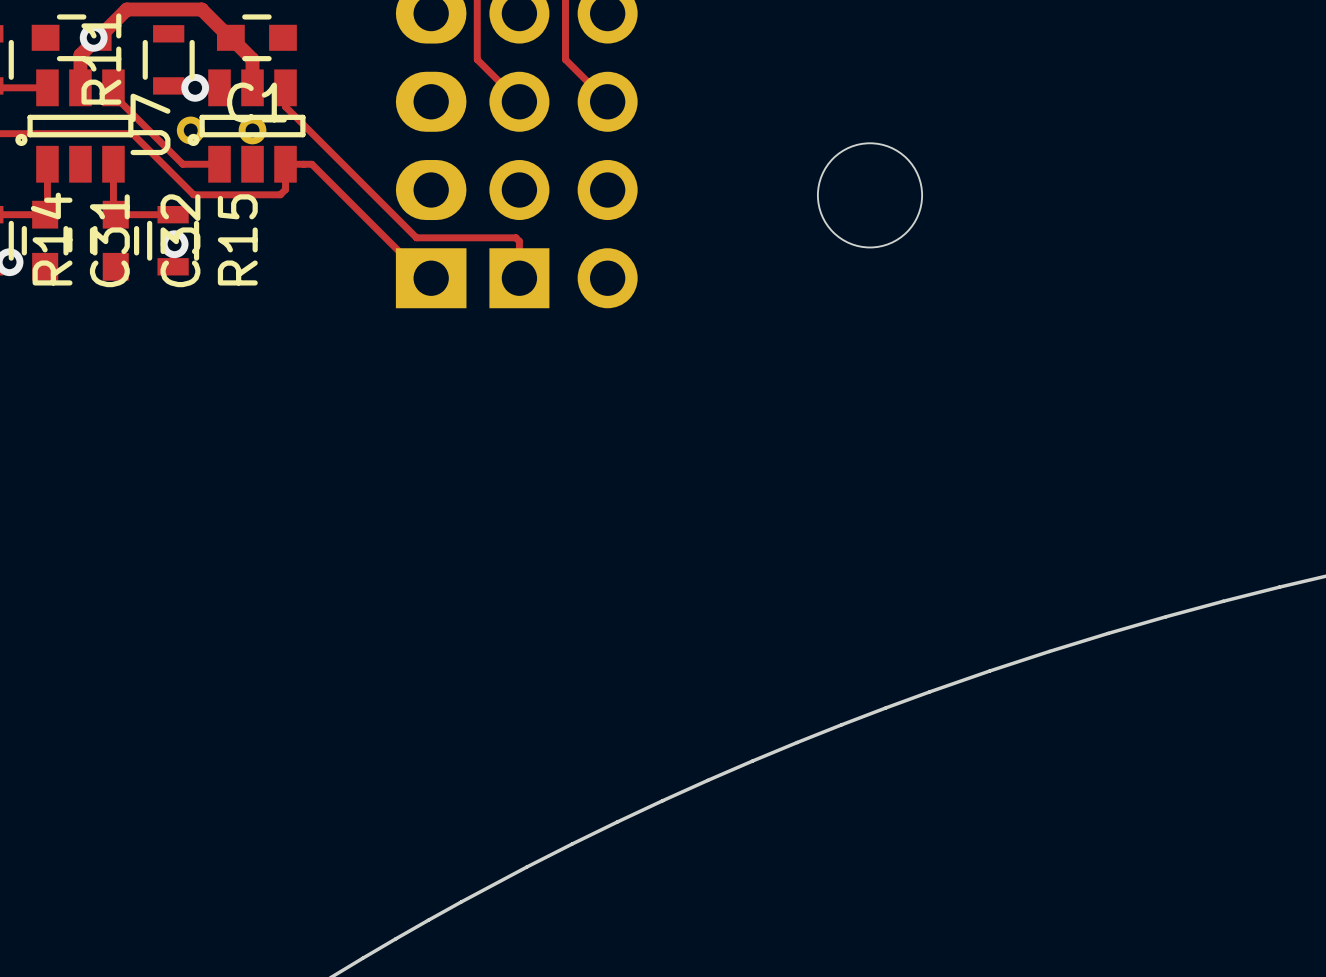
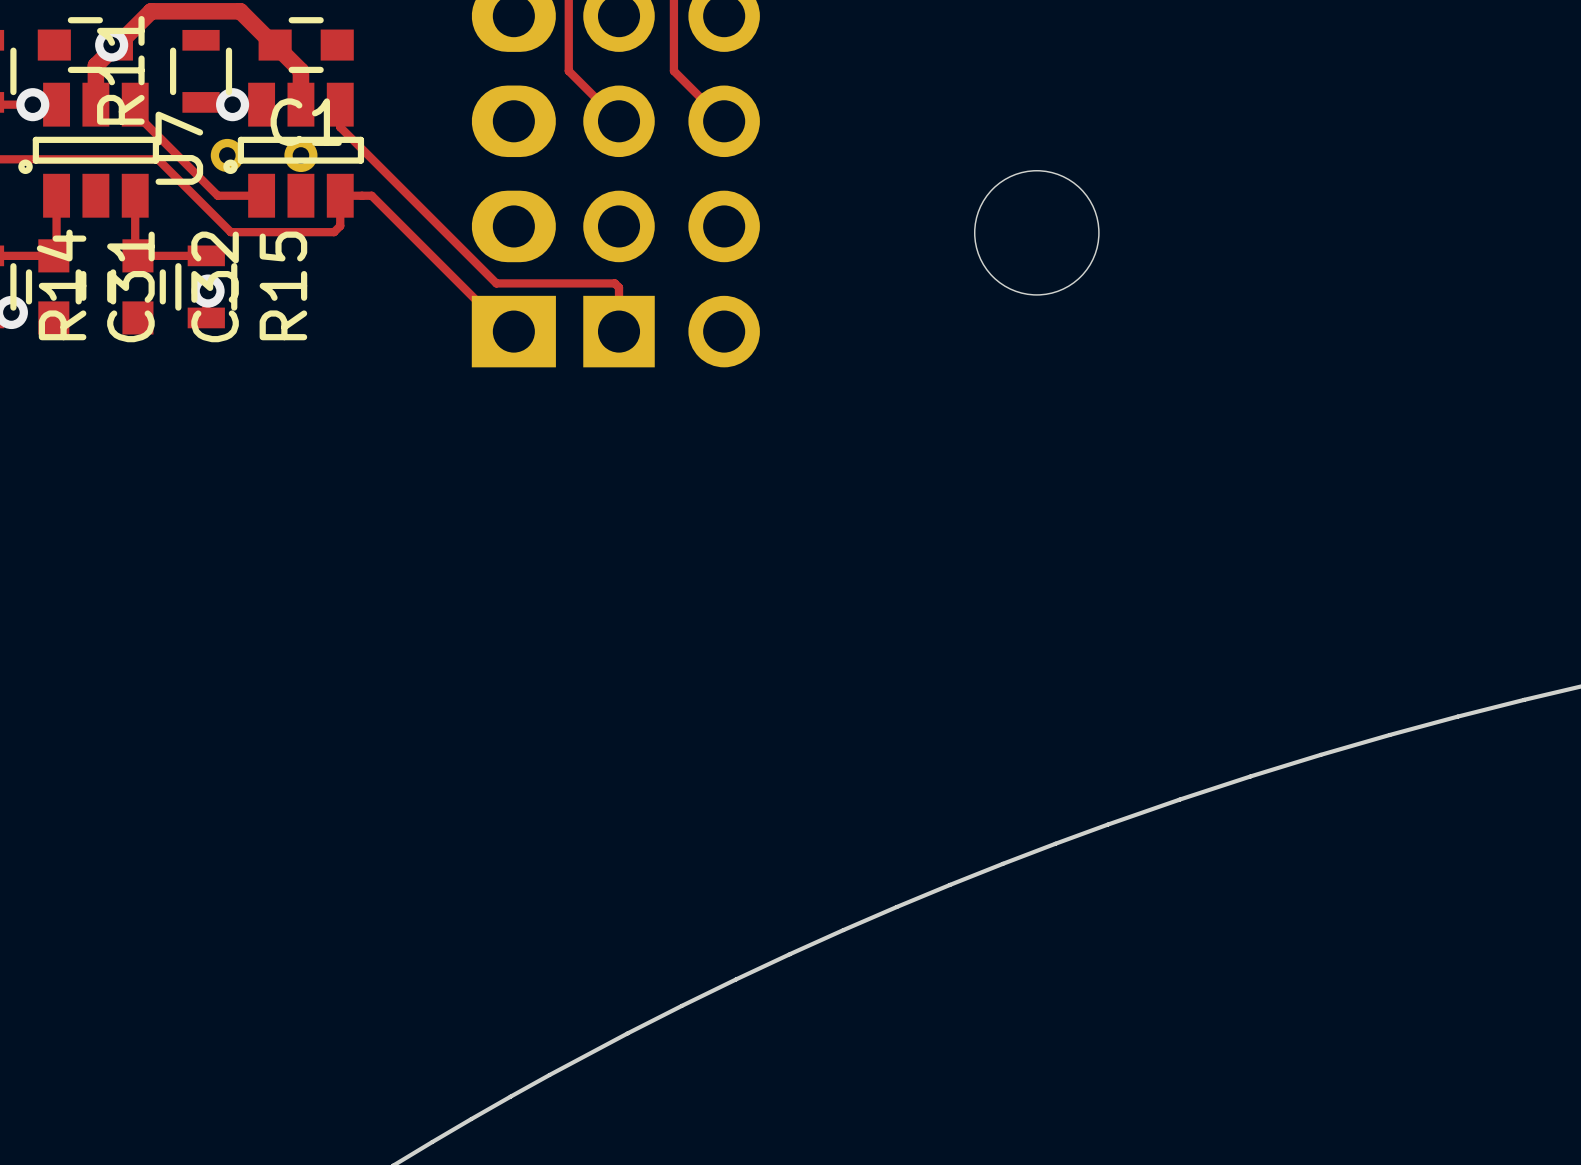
via: none -> (32, 104)

